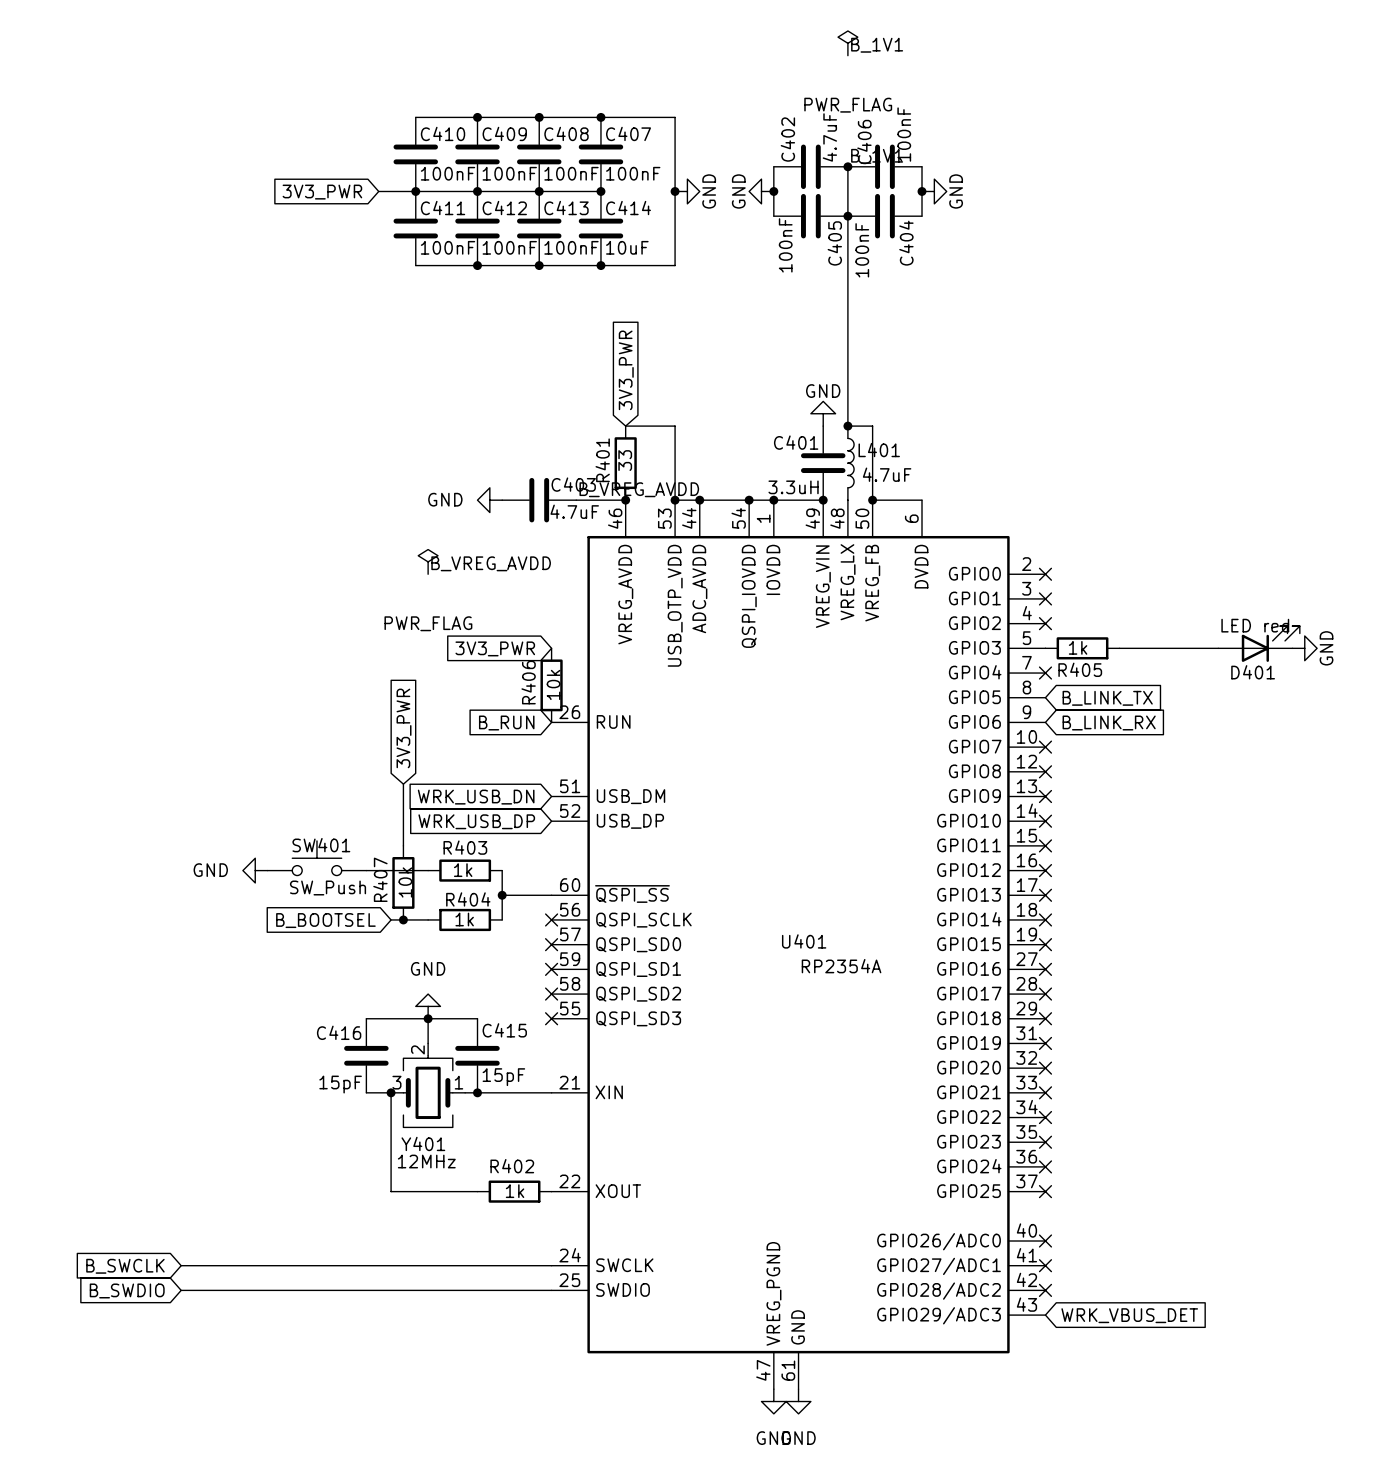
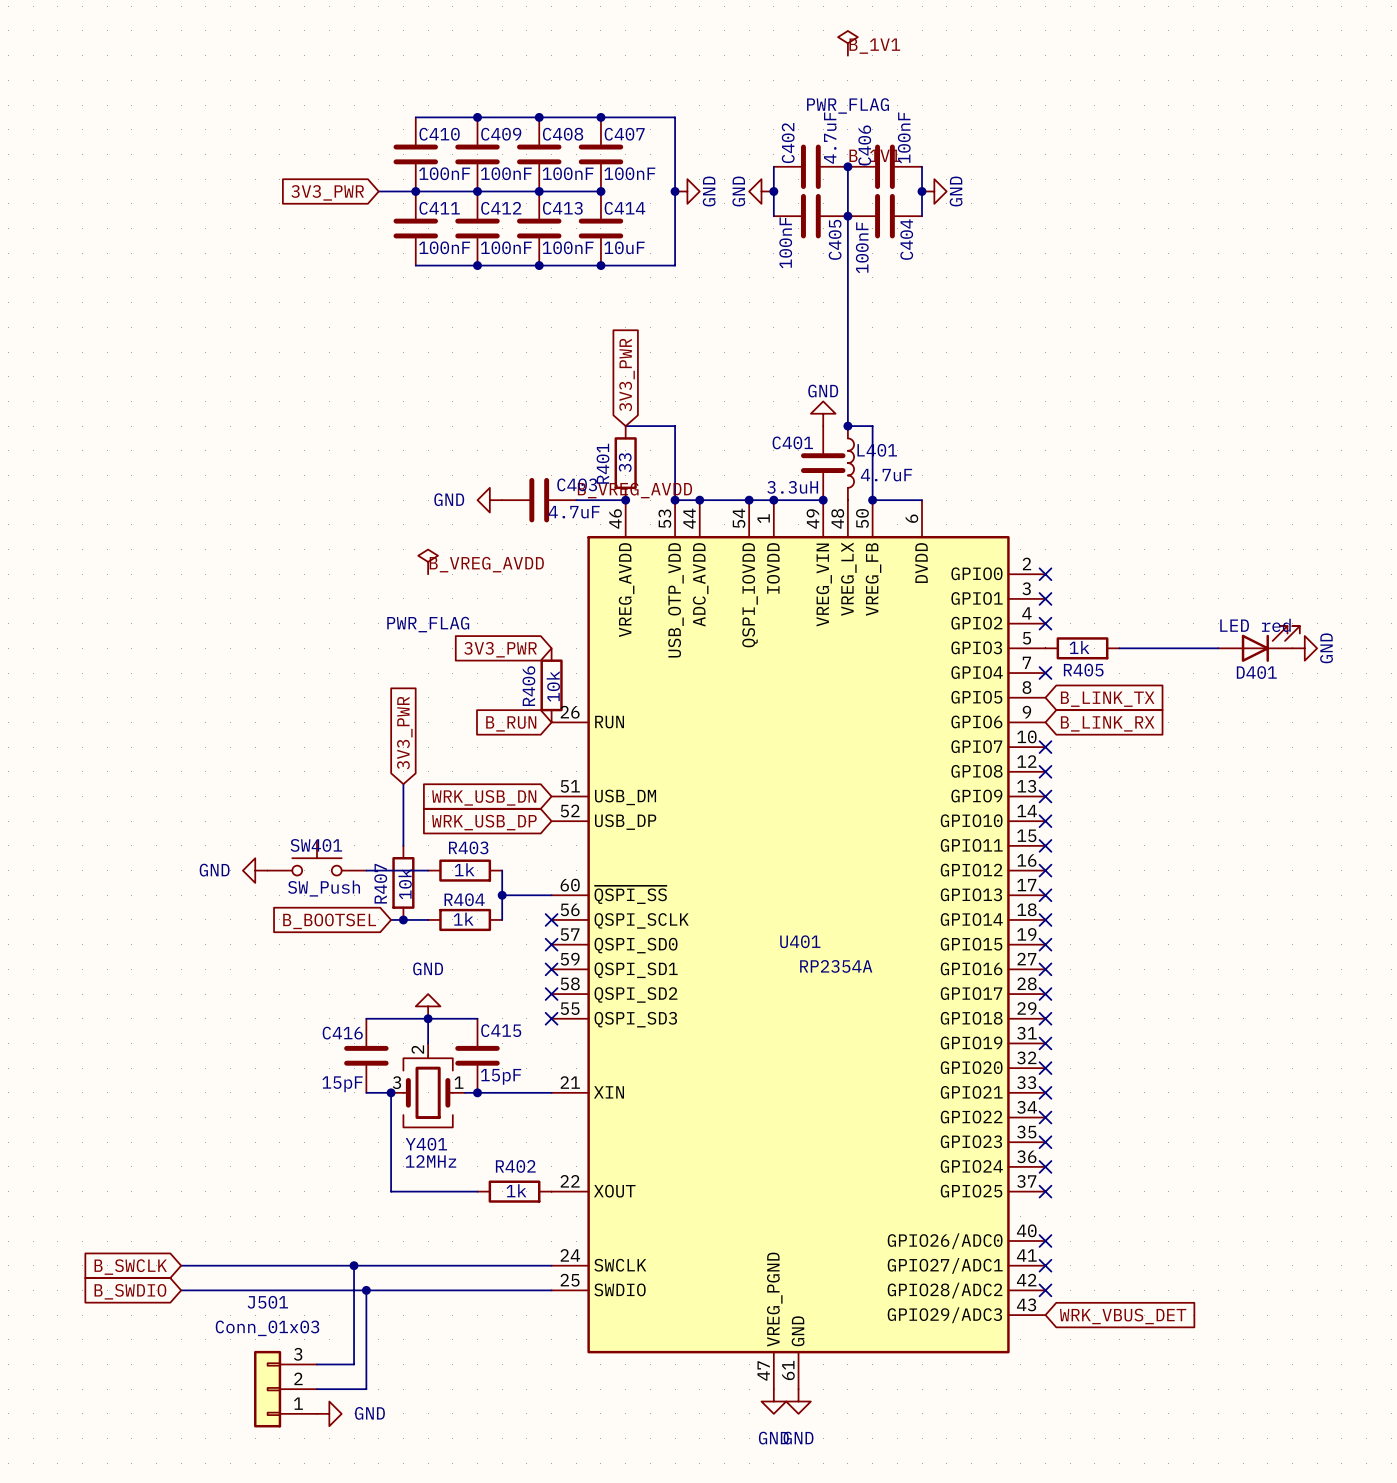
wire: none -> (354, 1265) (354, 1364) (316, 1364)
junction: none -> (354, 1265)
wire: none -> (366, 1290) (366, 1389) (316, 1389)
junction: none -> (366, 1290)
J501: none -> Conn_01x03 (285, 1389)
power symbol: none -> GND (329, 1413)

